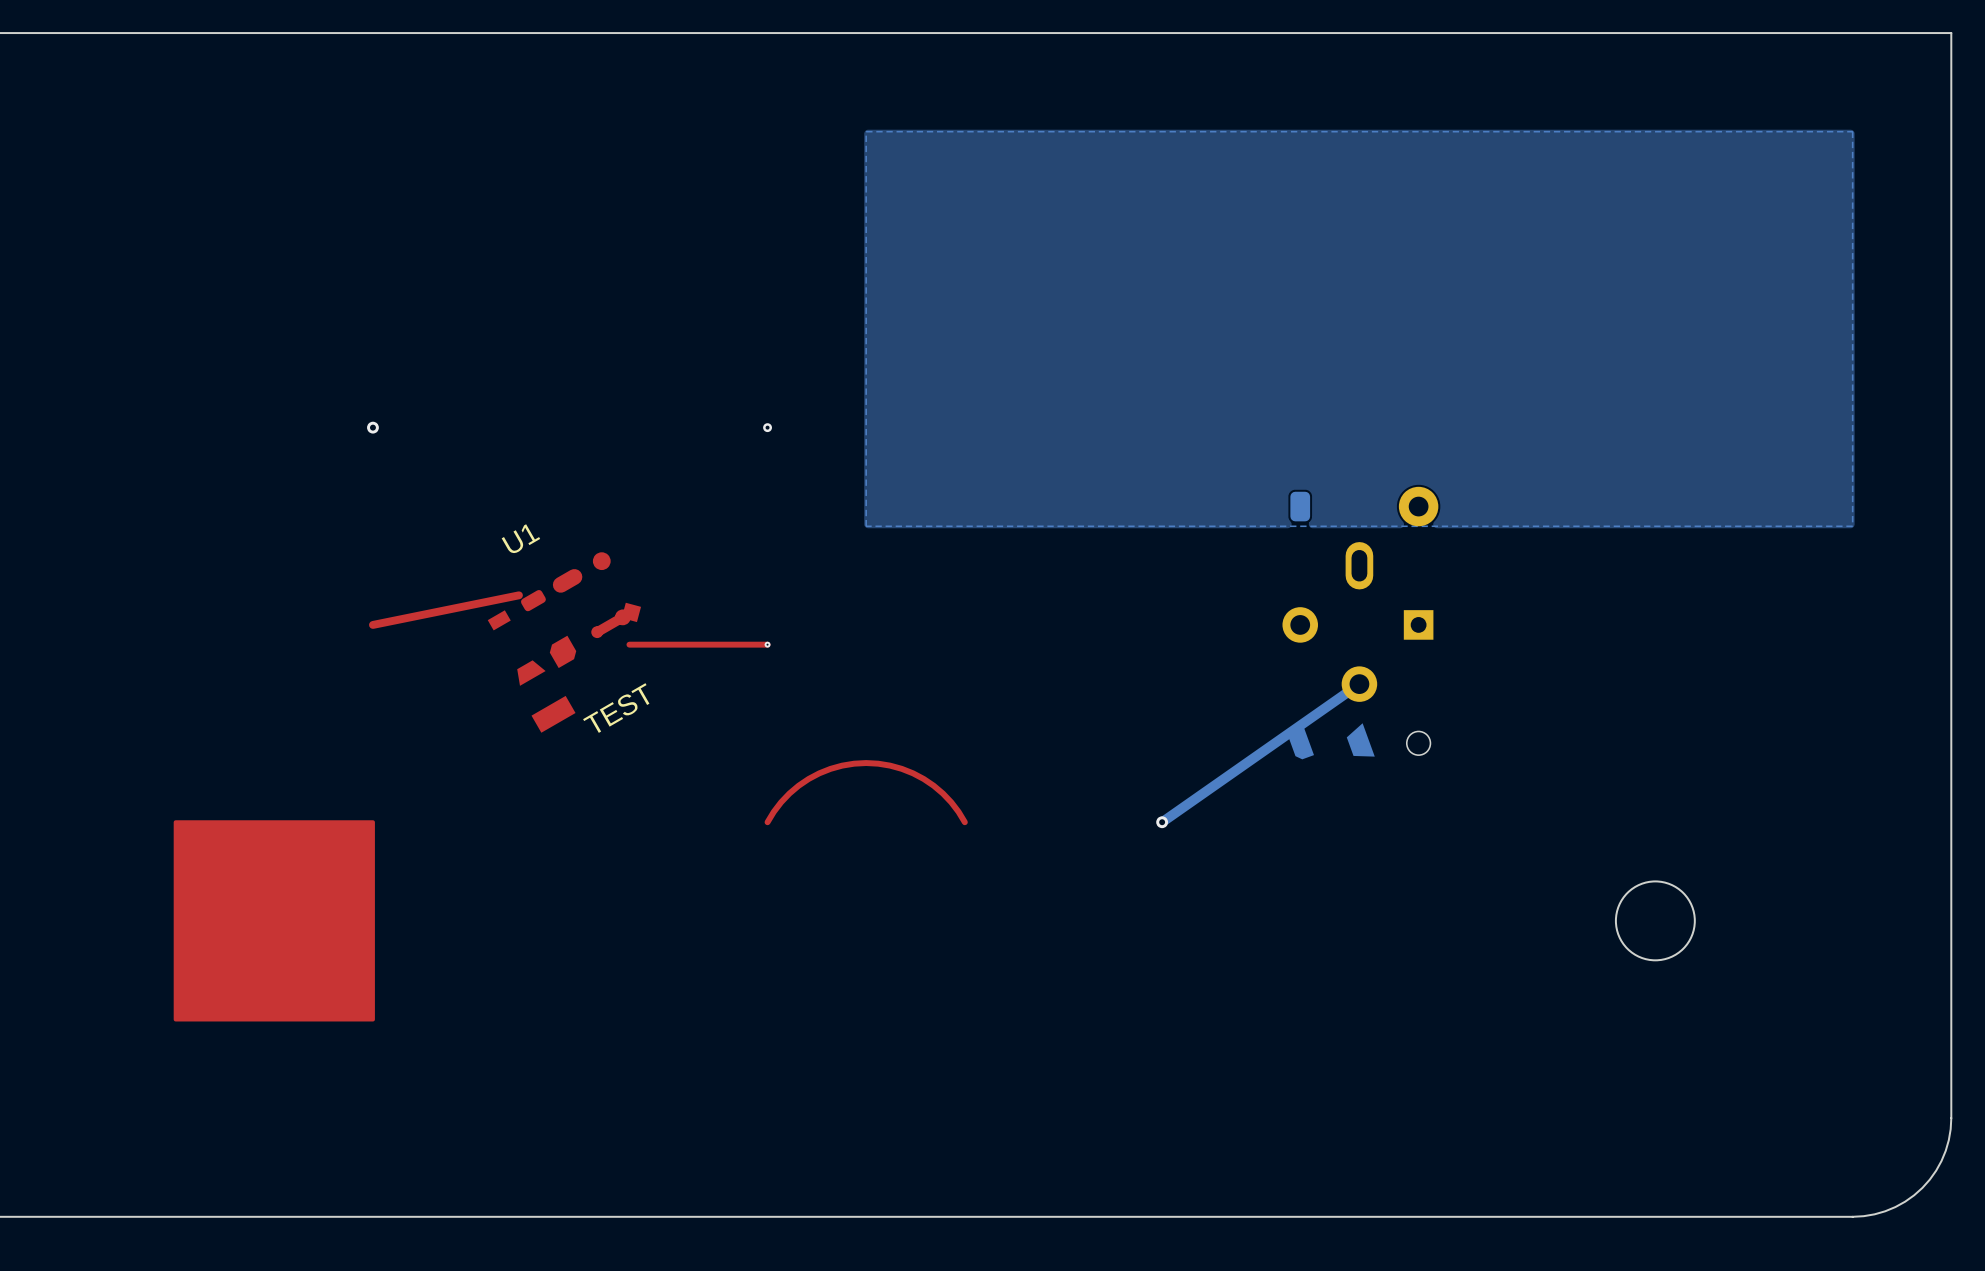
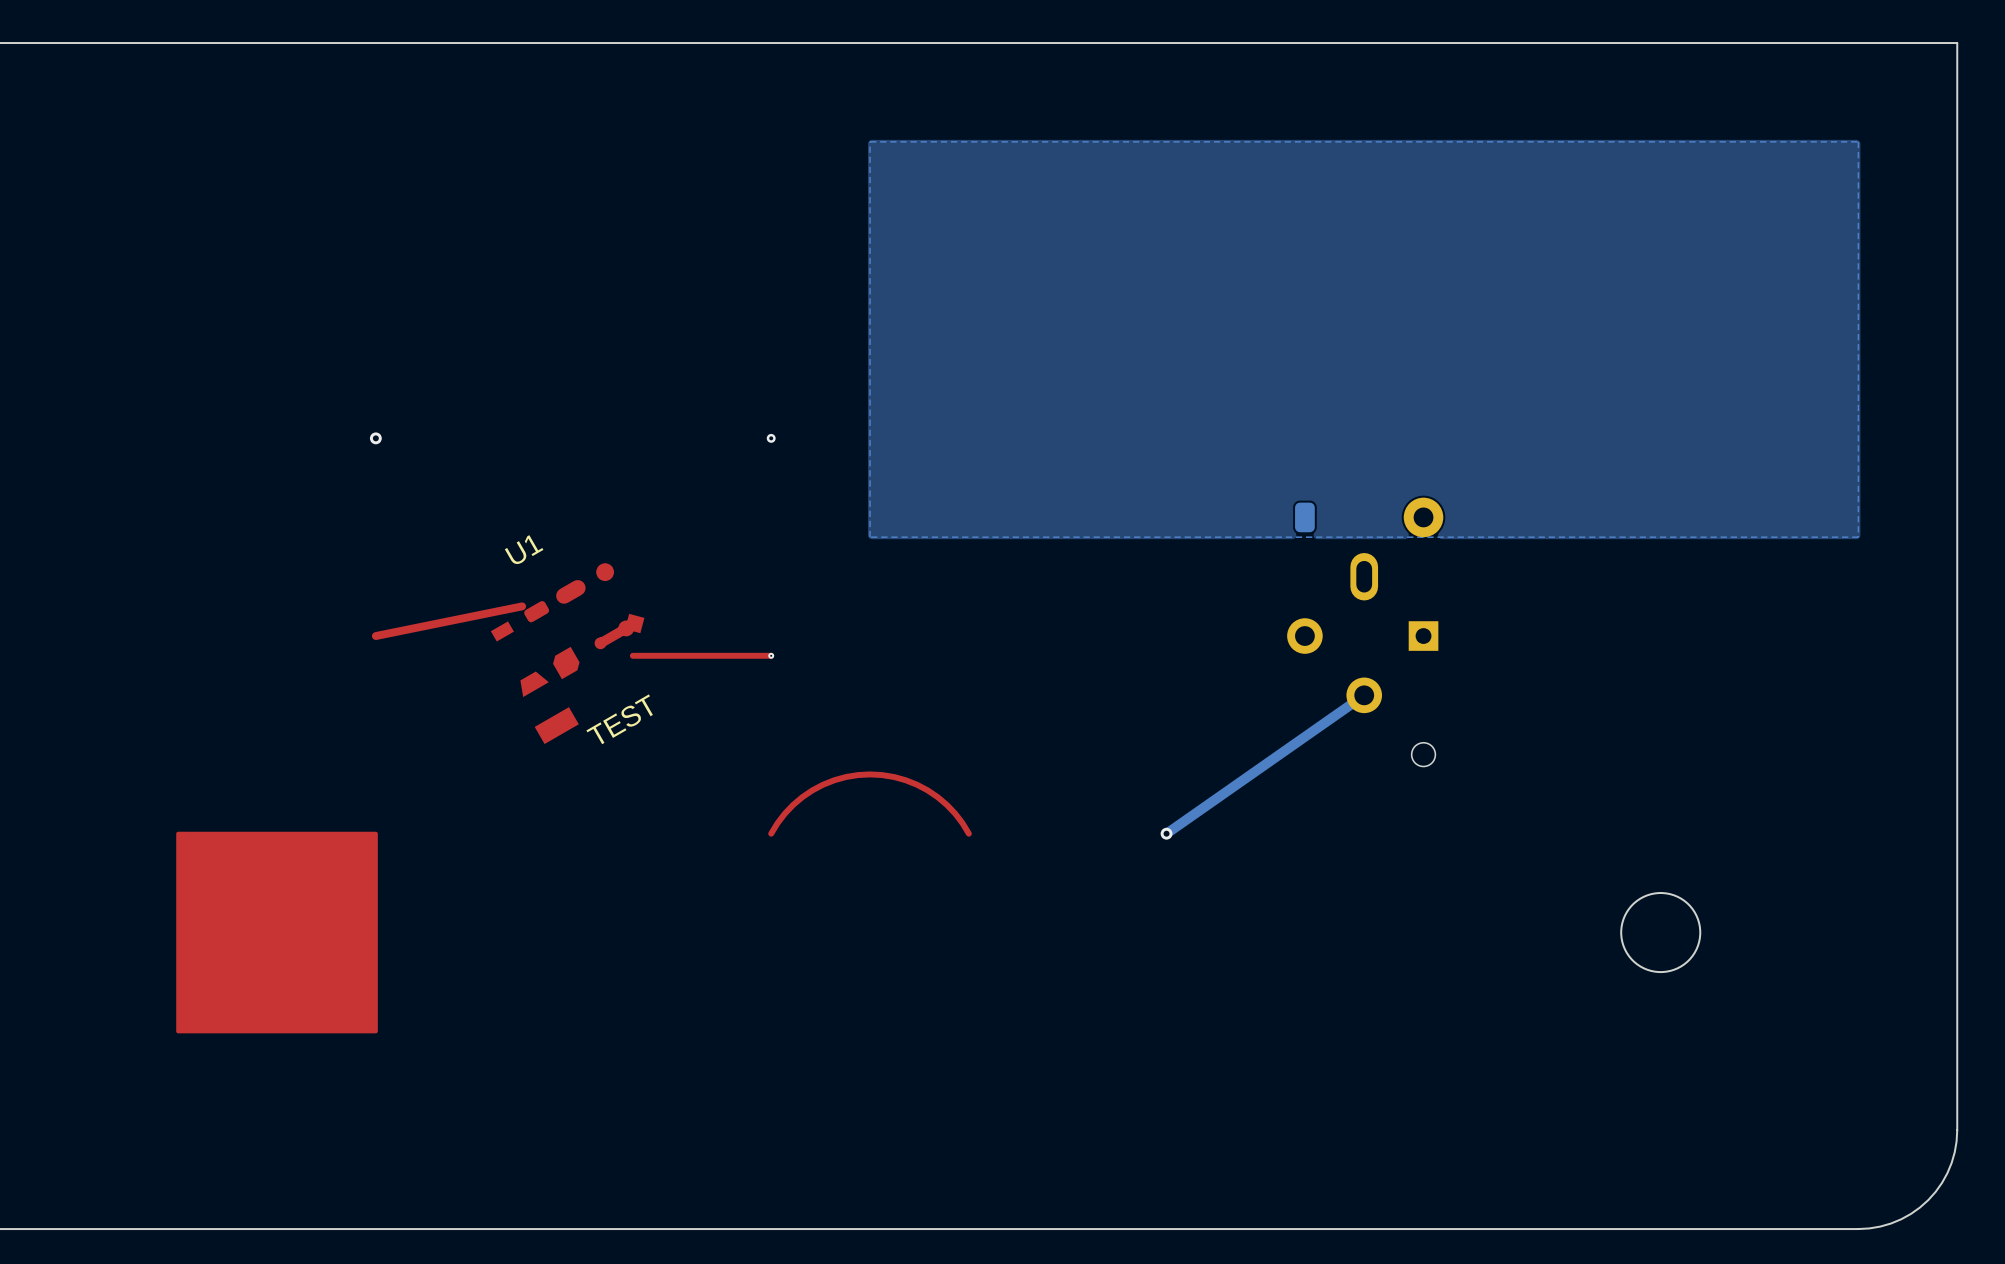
part footprint: [1282, 486, 1439, 760] -> [1287, 497, 1444, 767]

